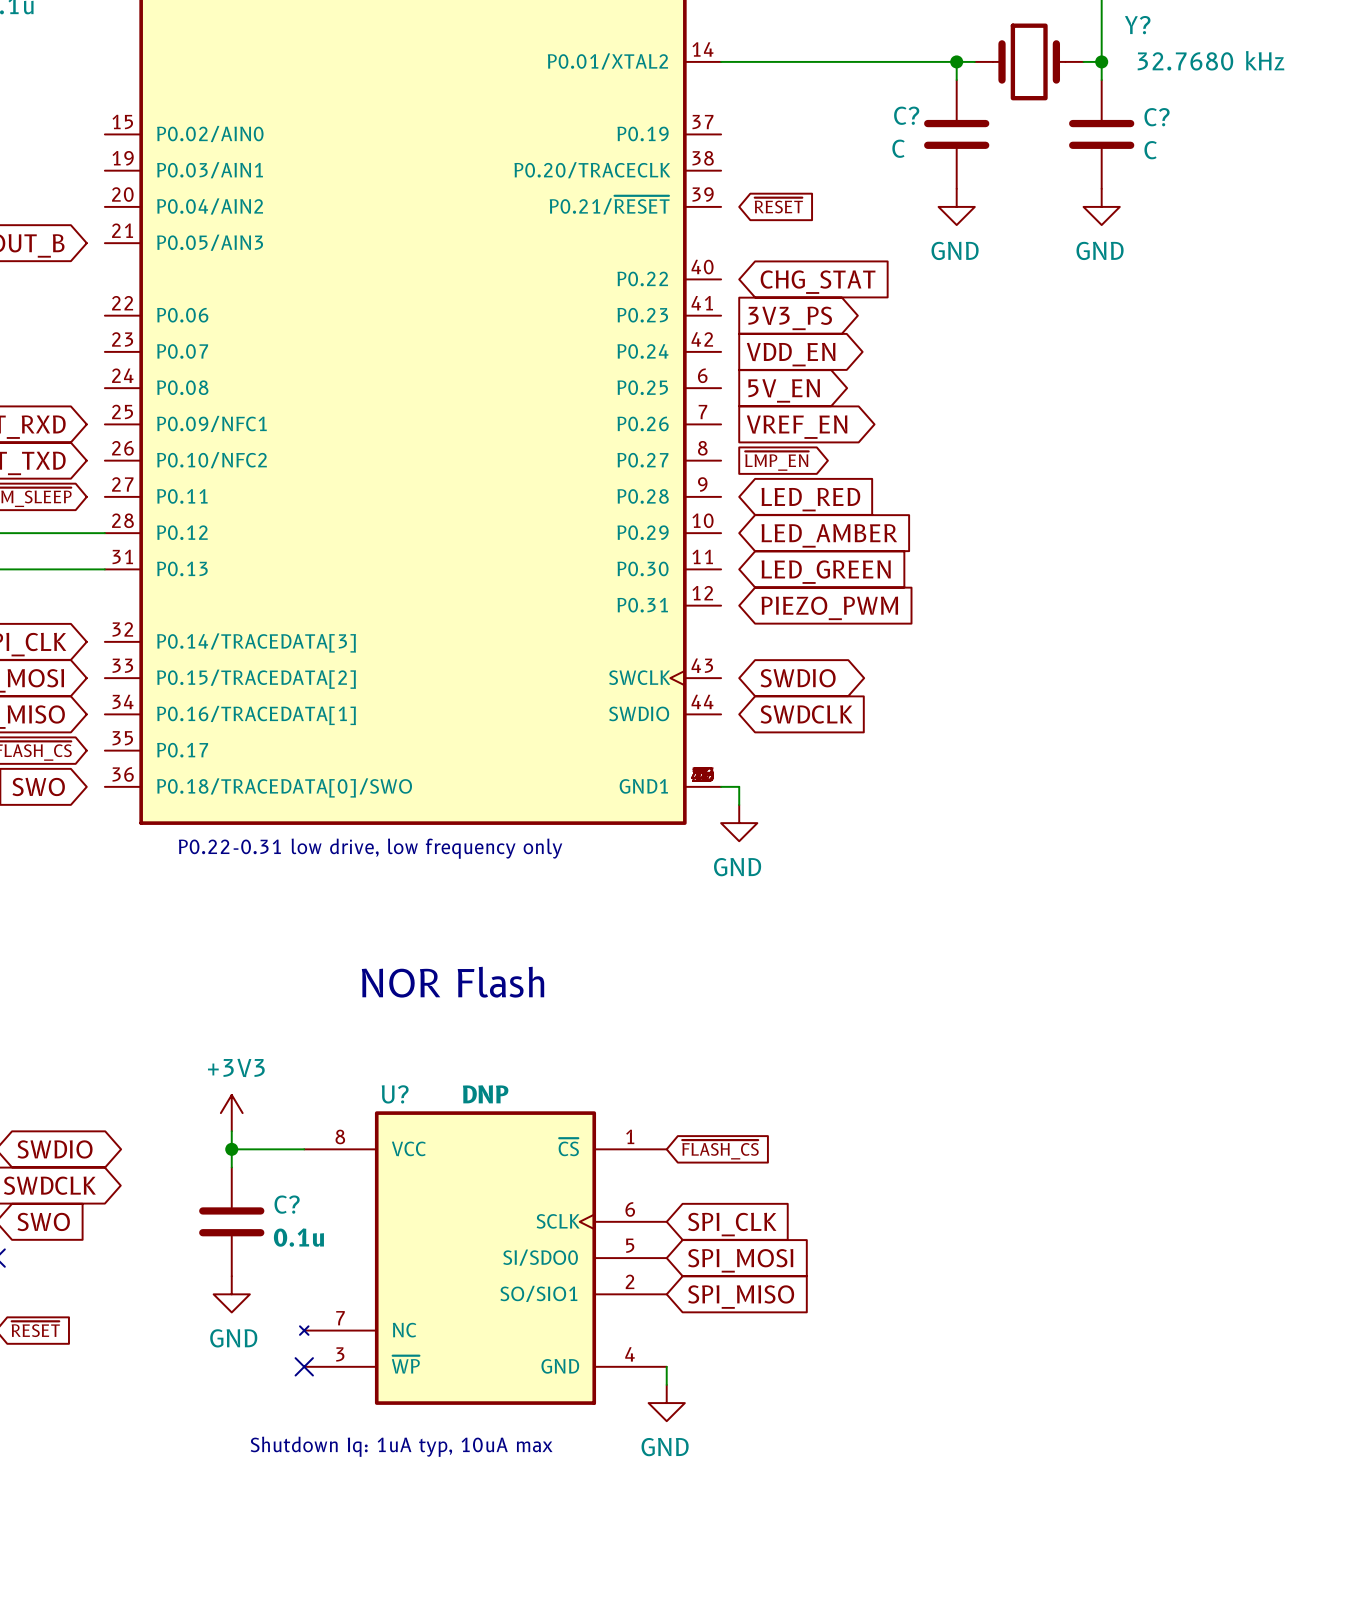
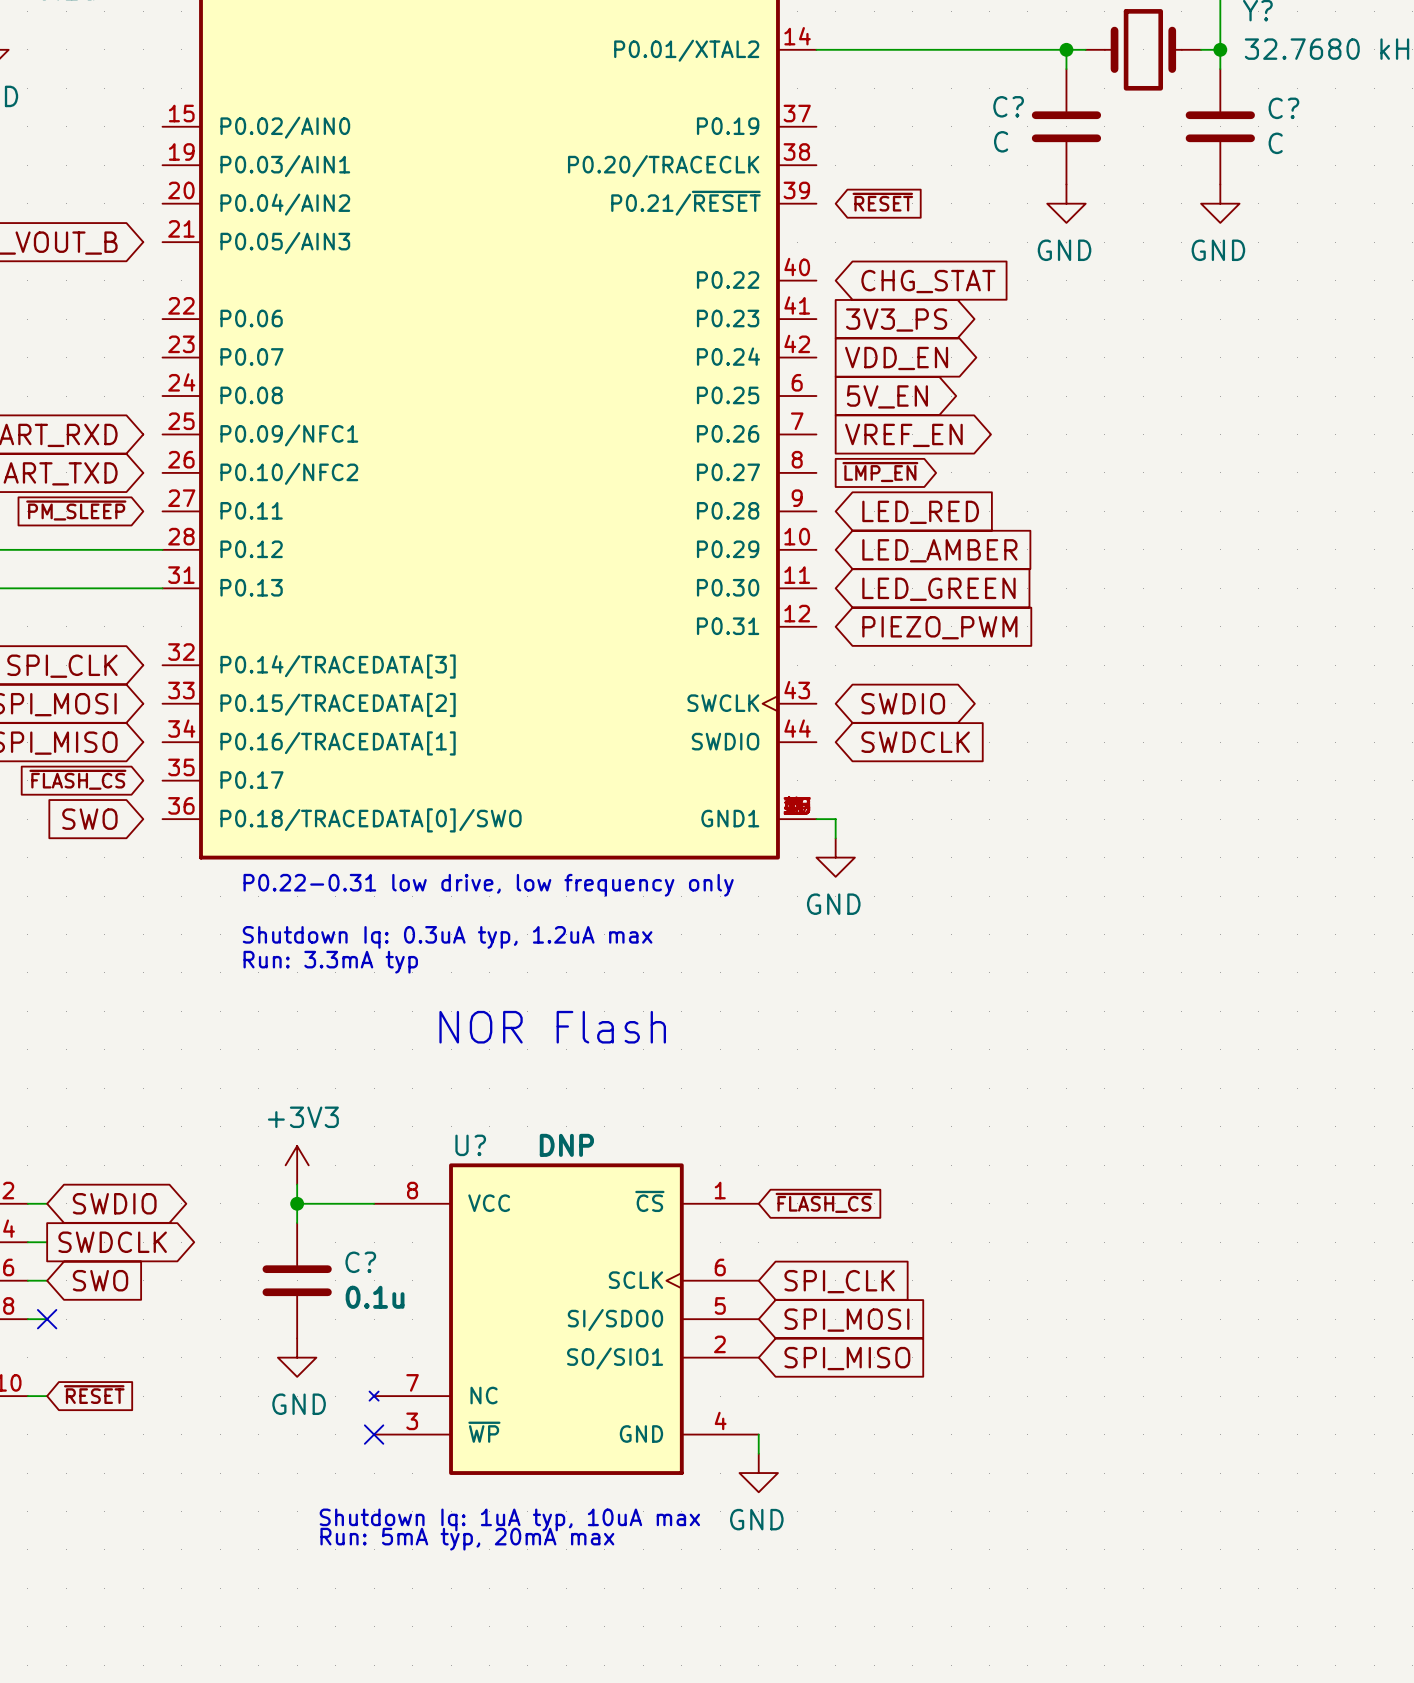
text: none -> Shutdown Iq: 0.3uA typ, 1.2uA max (447, 937)
text: none -> Run: 3.3mA typ (330, 962)
text: none -> Run: 5mA typ, 20mA max (467, 1539)

